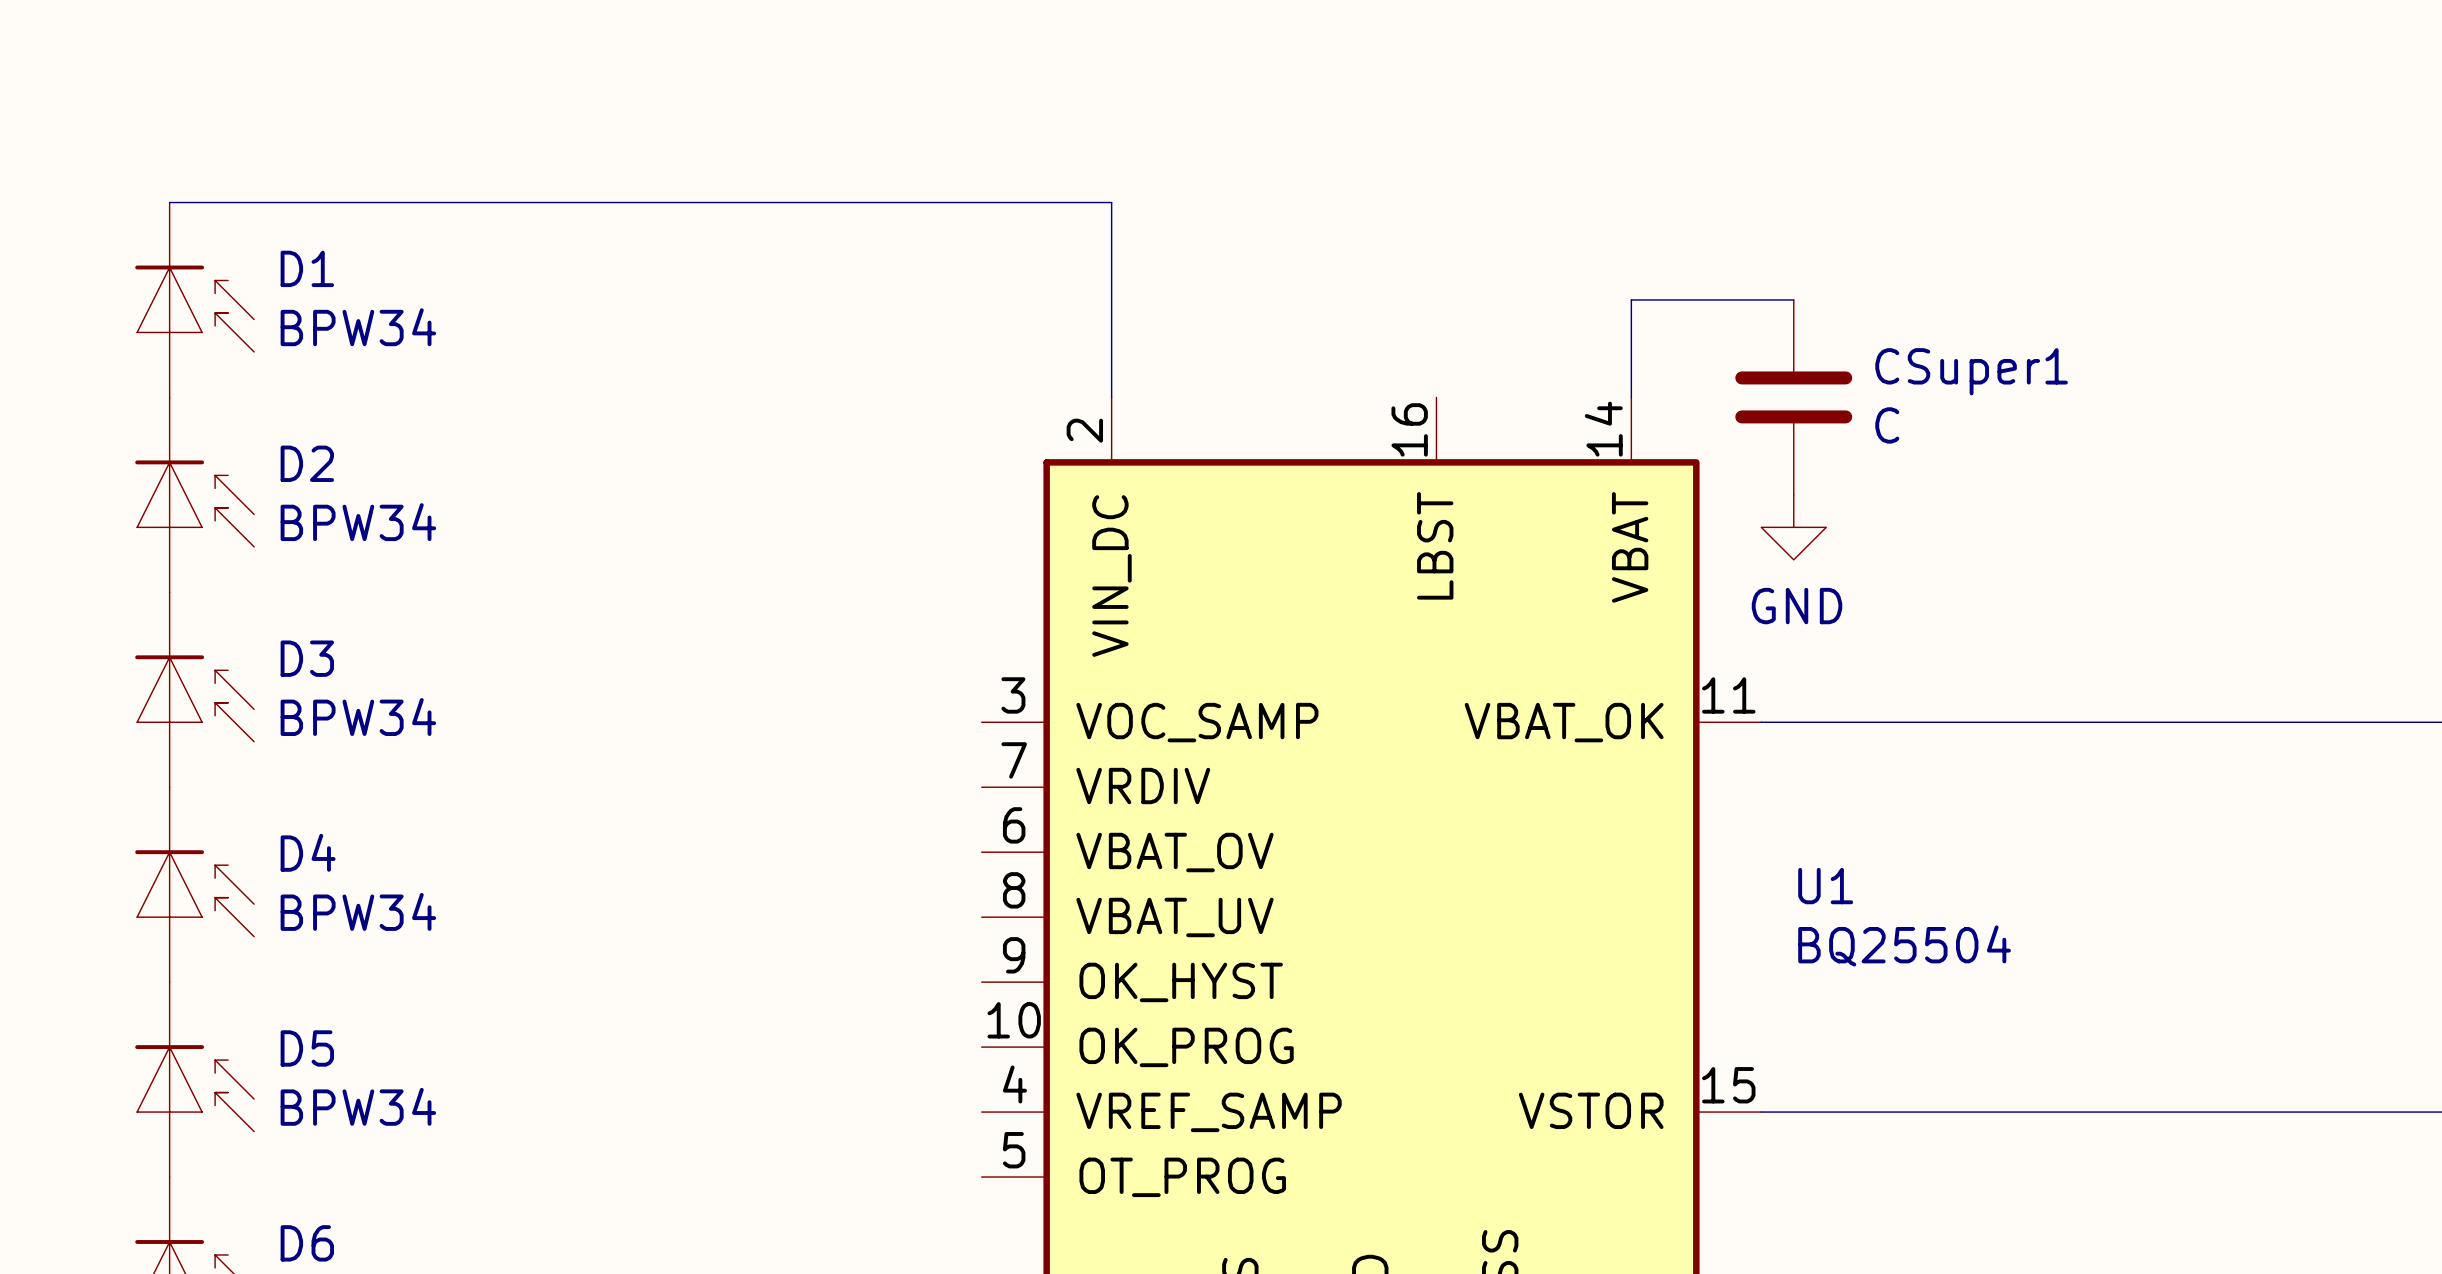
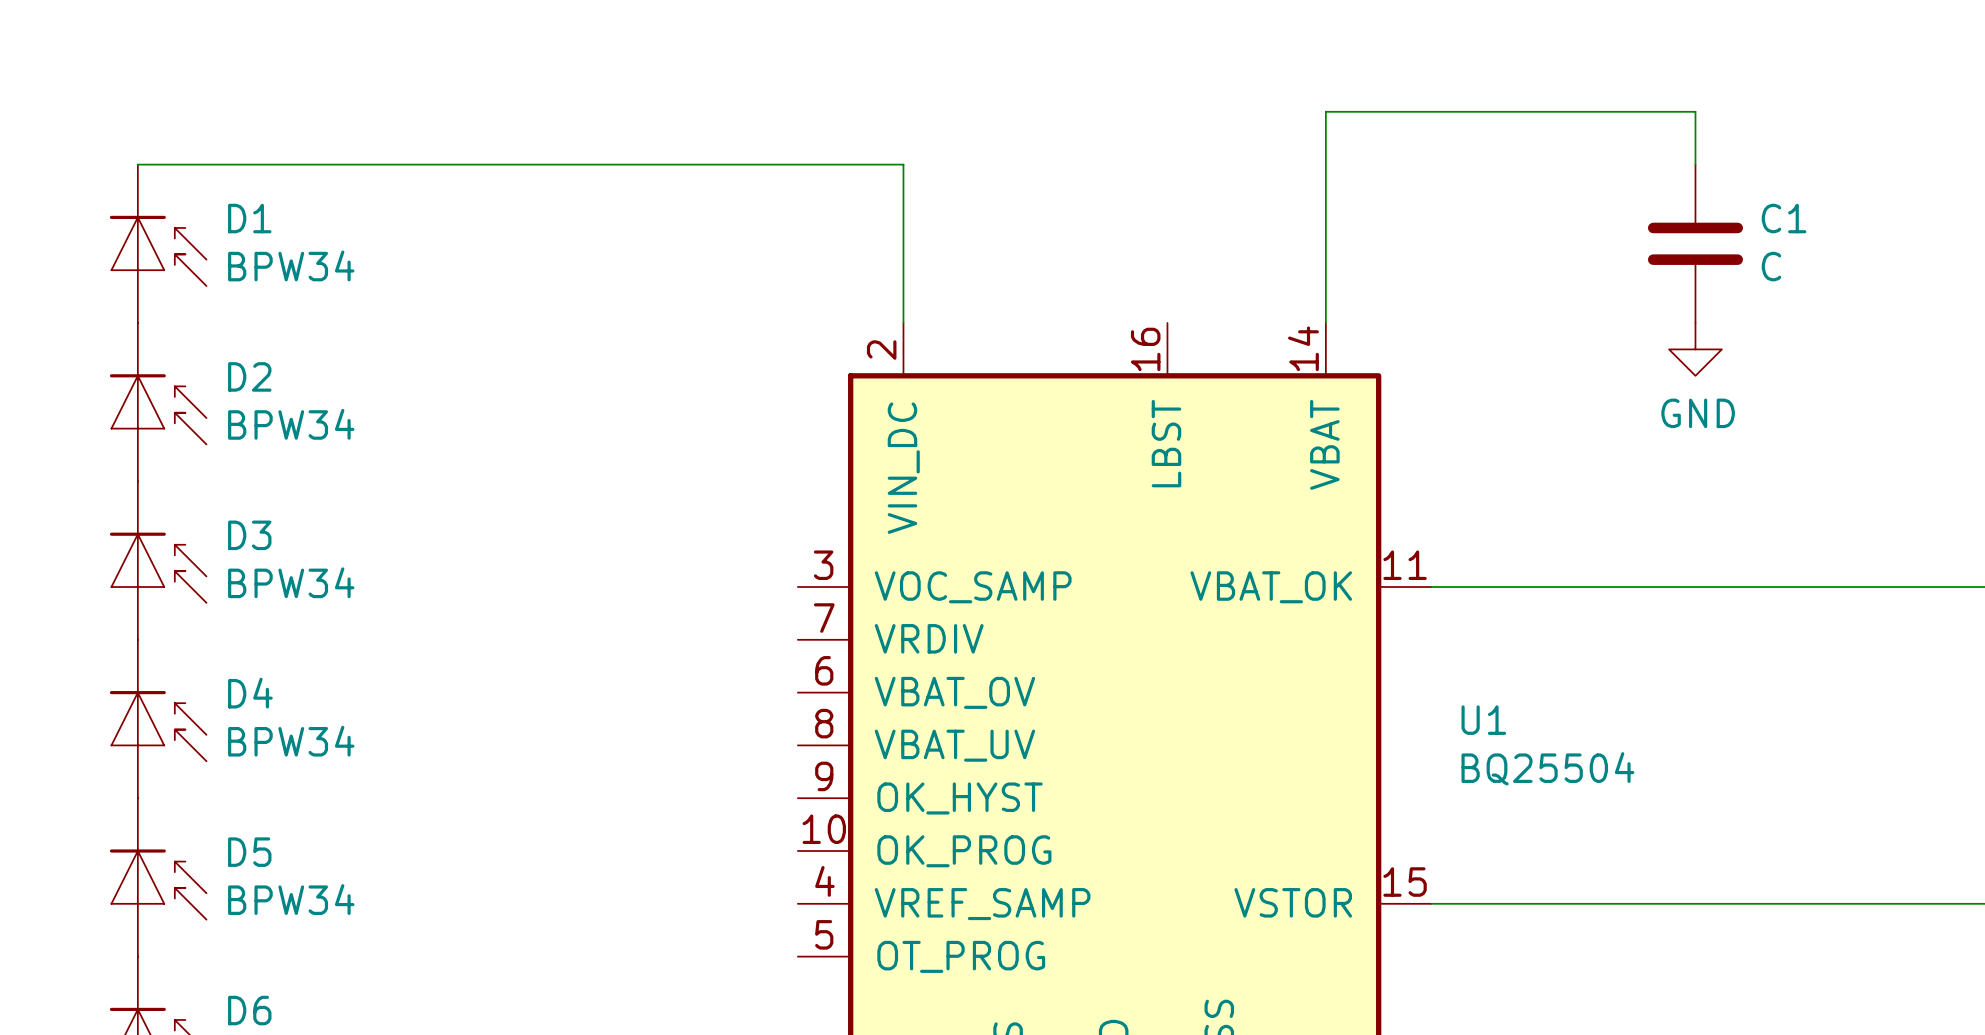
wire: (1631, 299) (1793, 299) -> (1325, 243) (1325, 111) (1695, 111) (1695, 164)
C1: none -> C (1695, 243)
CSuper1: C (1793, 397) -> none
power symbol position: GND (1793, 527) -> GND (1695, 349)

